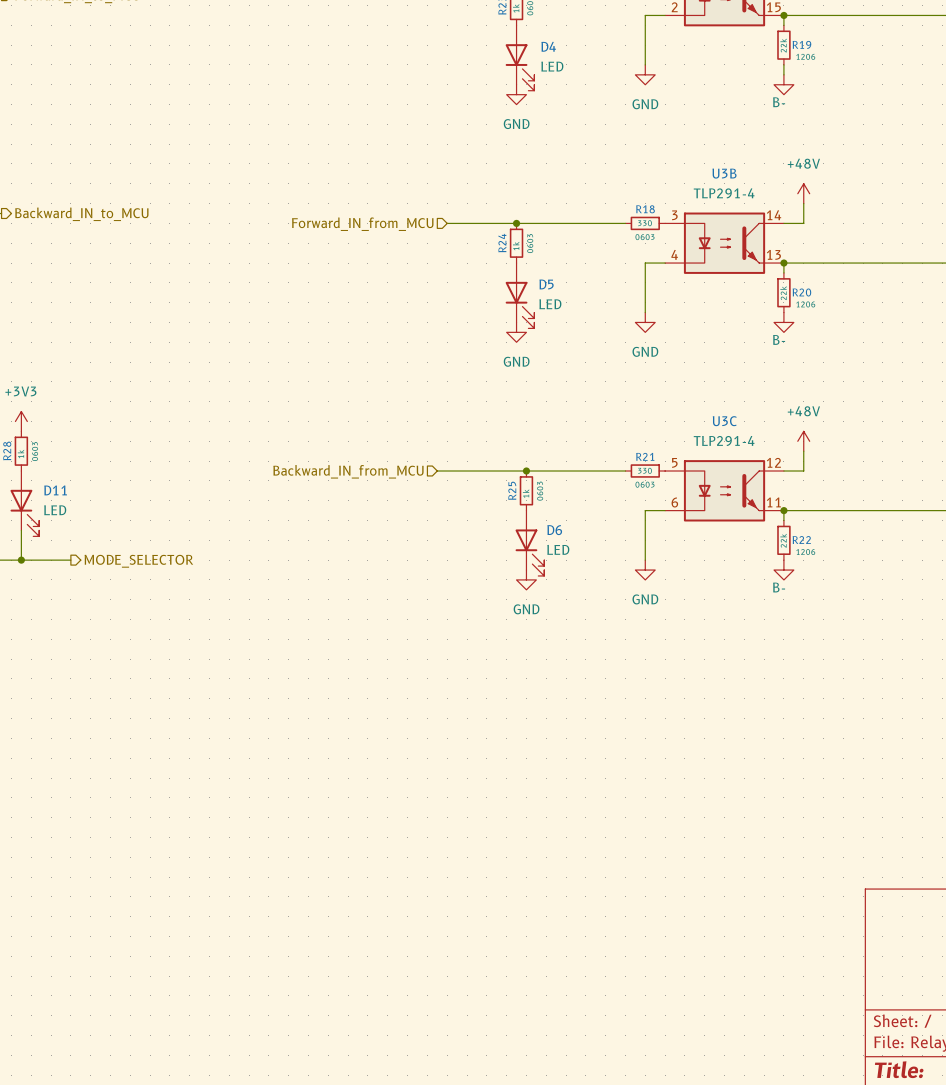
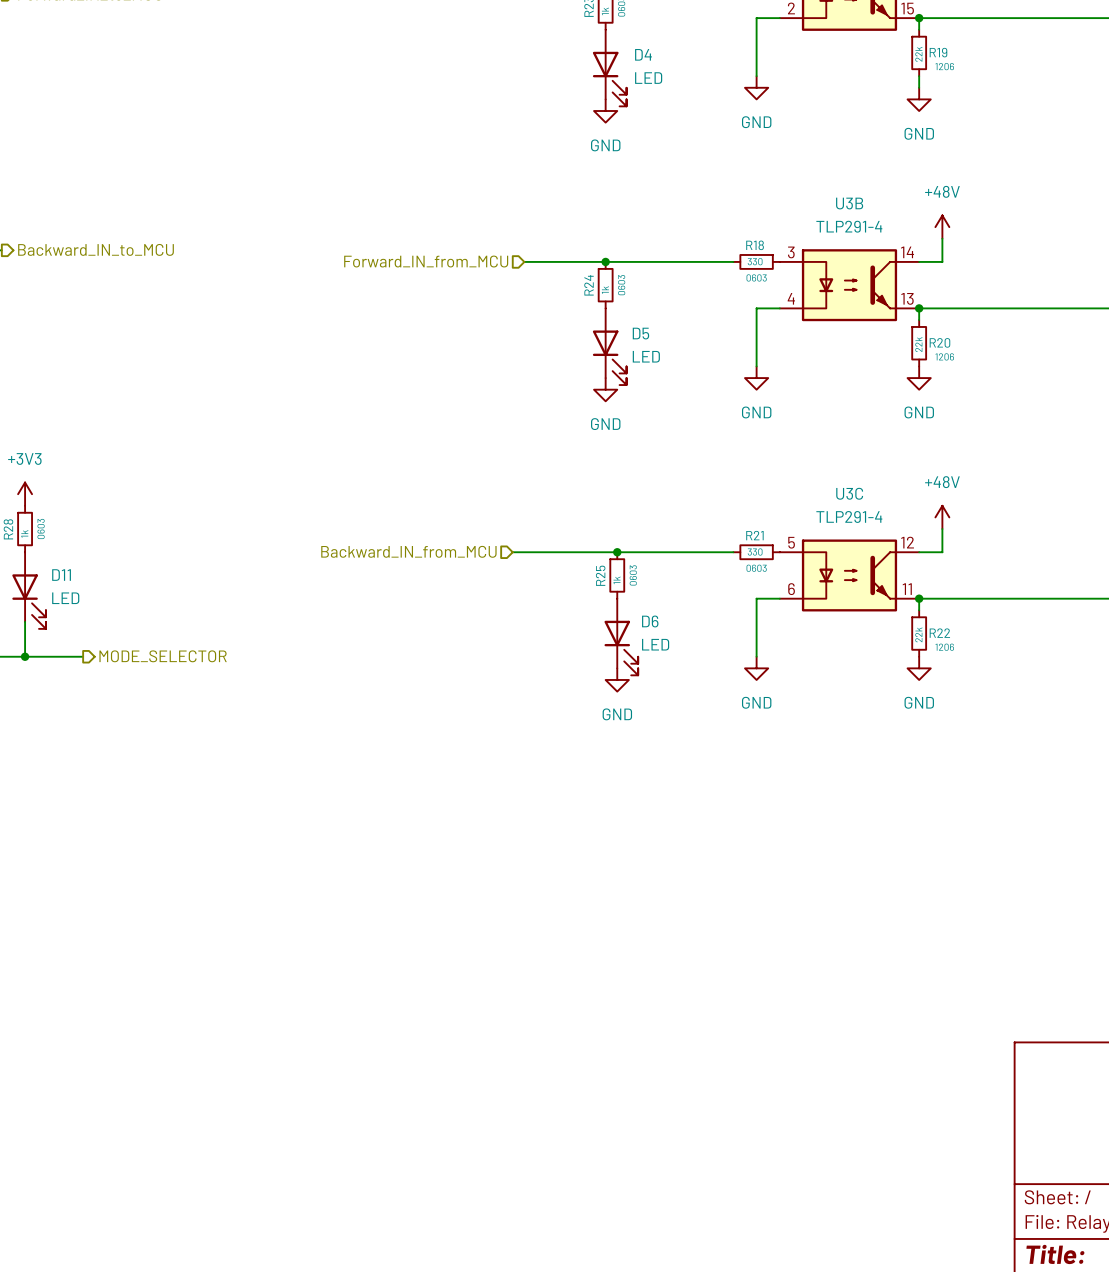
power symbol: B- (783, 84) -> GND (919, 99)
power symbol: B- (783, 322) -> GND (919, 378)
power symbol: B- (783, 570) -> GND (919, 668)

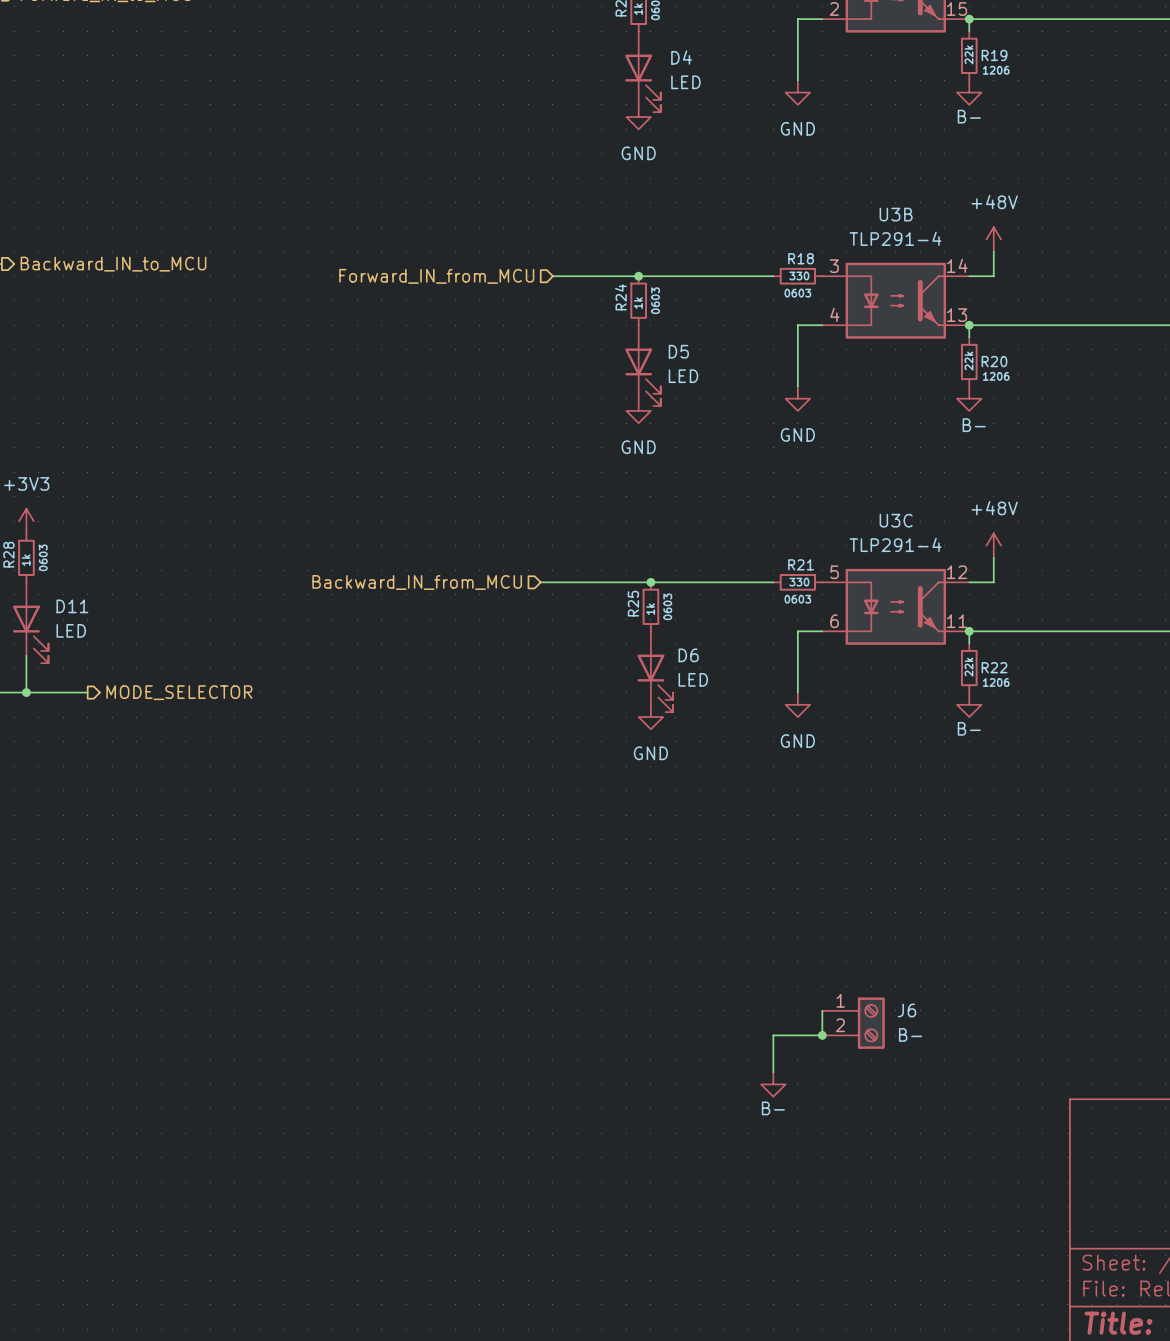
power symbol: none -> B- (969, 92)
power symbol: GND (919, 99) -> none
power symbol: GND (919, 378) -> B- (969, 398)
power symbol: GND (919, 668) -> B- (969, 704)
wire: none -> (822, 1010) (822, 1035) (773, 1035) (773, 1072)
J6: none -> B- (853, 1023)
junction: none -> (822, 1035)
power symbol: none -> B- (773, 1084)

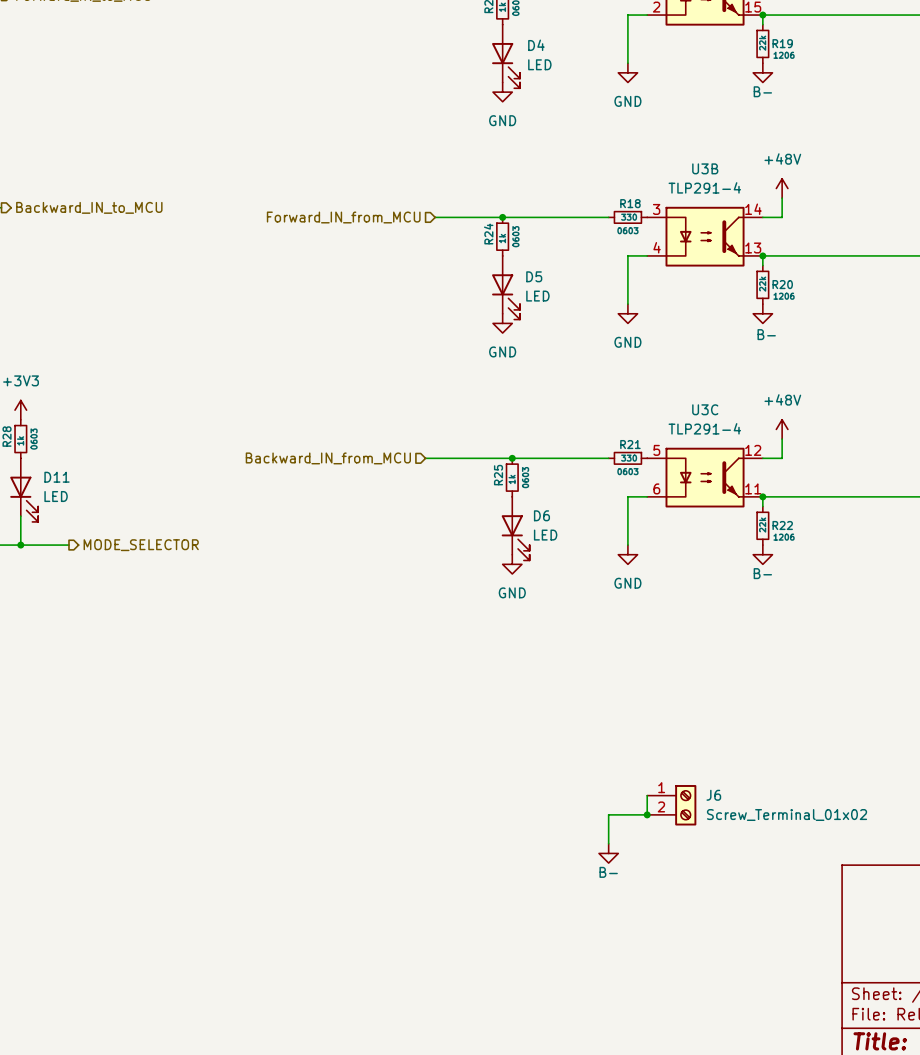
J6 value: B- (910, 1034) -> Screw_Terminal_01x02 (787, 814)

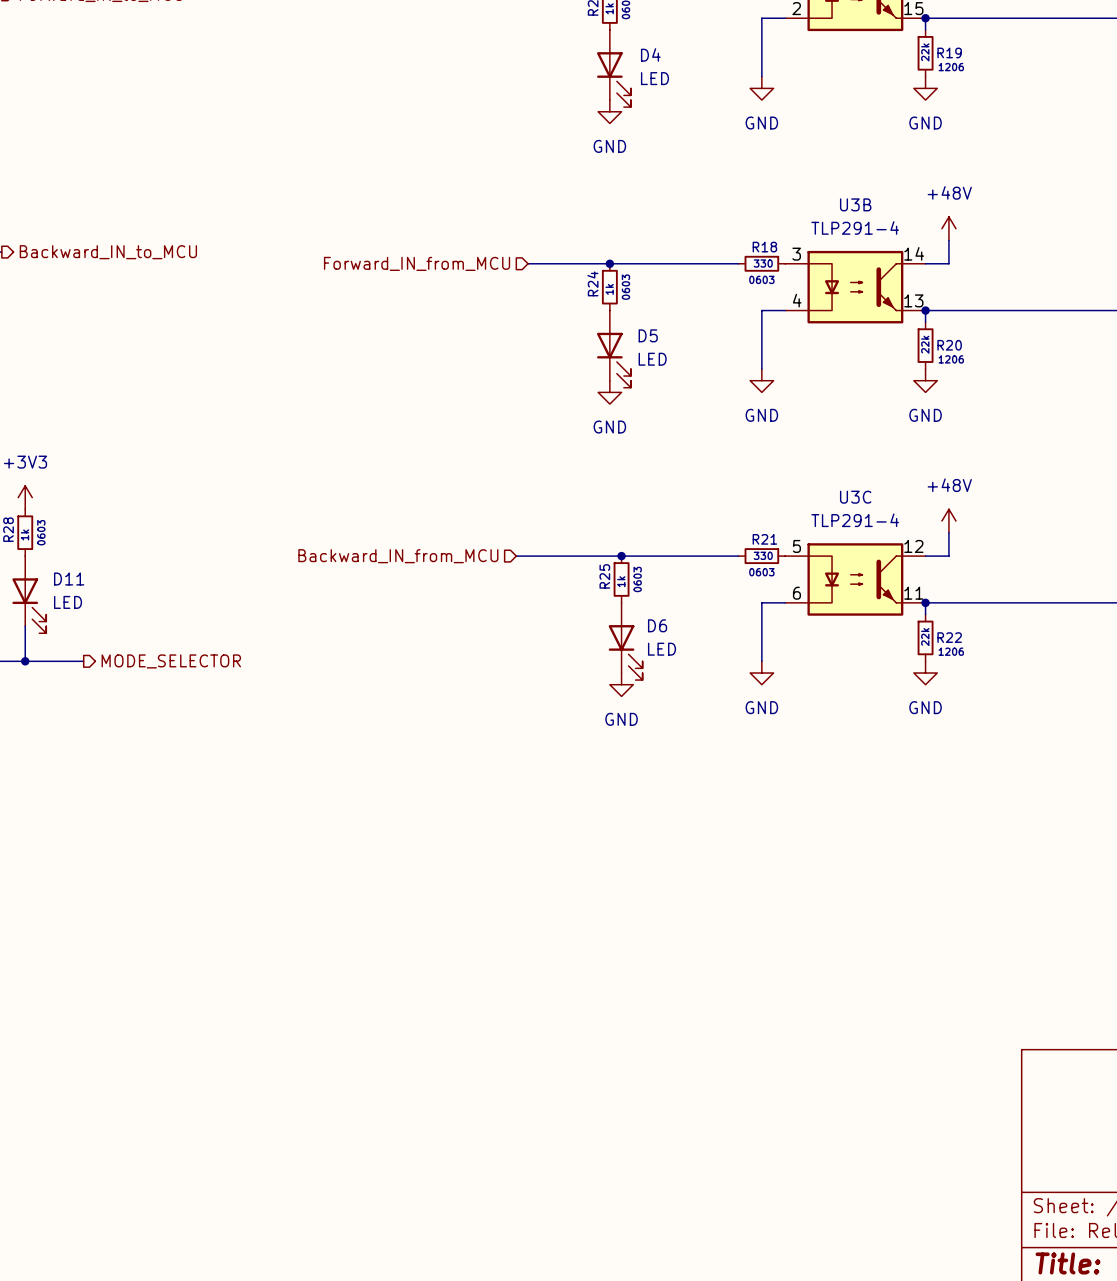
power symbol: B- (762, 72) -> GND (925, 88)
power symbol: B- (762, 313) -> GND (925, 380)
power symbol: B- (762, 554) -> GND (925, 673)
wire: (647, 795) (647, 814) (608, 814) (608, 843) -> none
J6: Screw_Terminal_01x02 (671, 805) -> none
junction: (647, 814) -> none
power symbol: B- (608, 853) -> none

